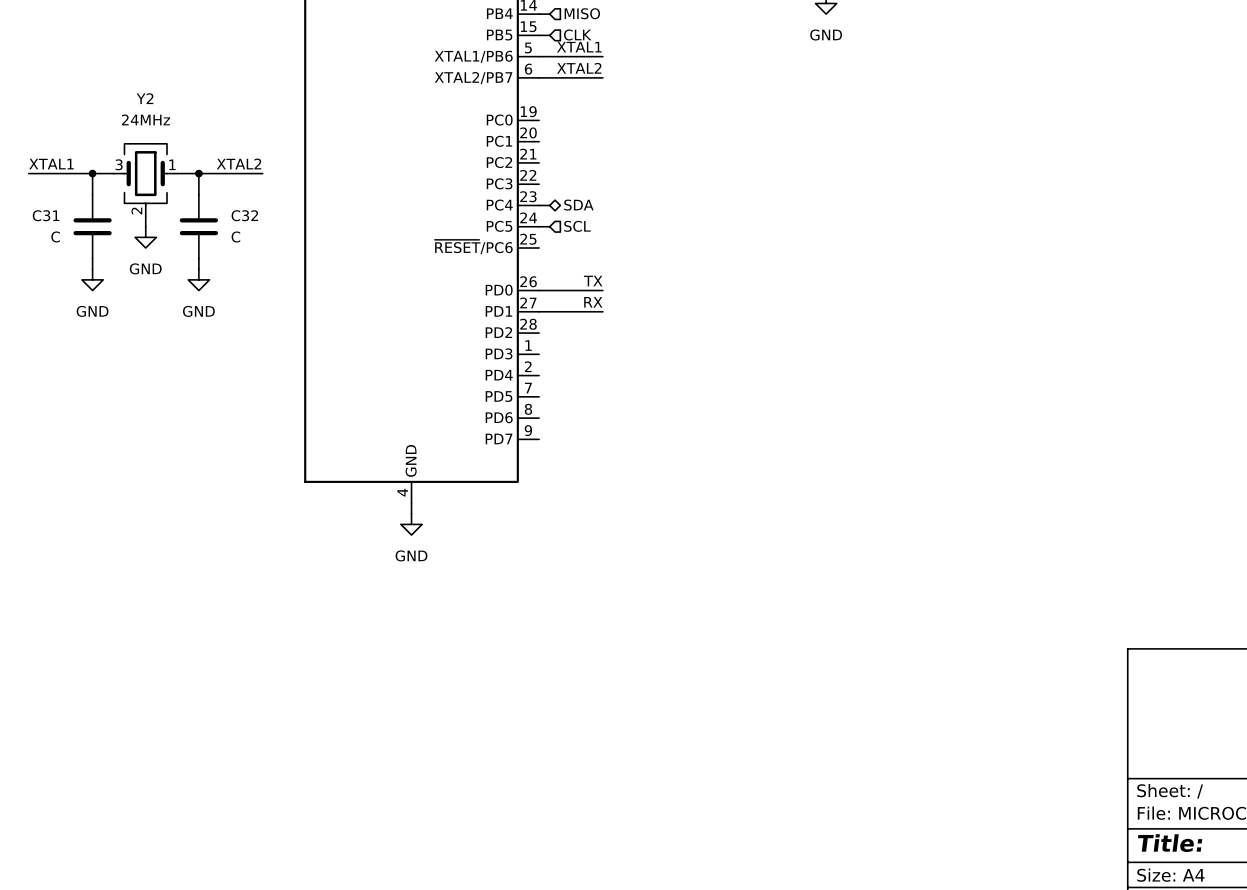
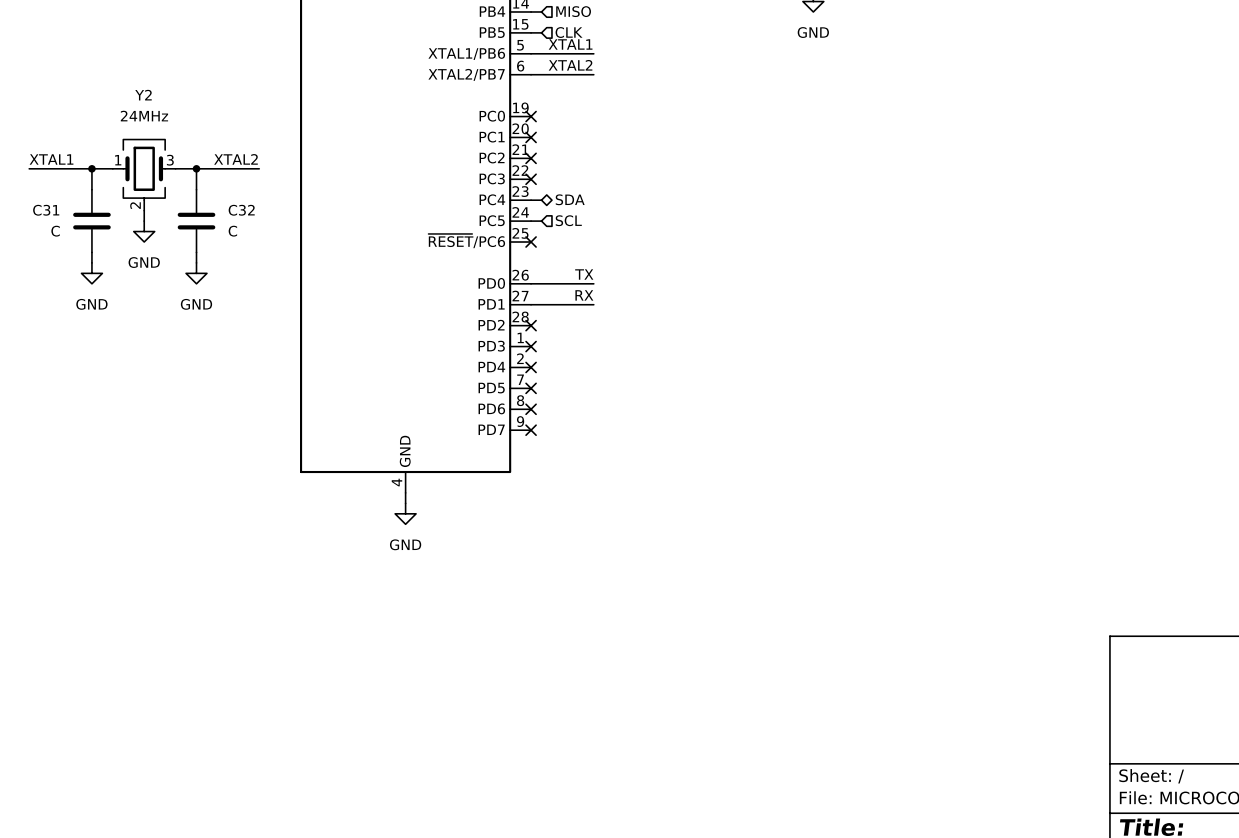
no-connect mark: none -> (531, 116)
no-connect mark: none -> (531, 137)
no-connect mark: none -> (531, 158)
Y2 flip: as is (145, 174) -> left-right (144, 169)
no-connect mark: none -> (531, 179)
no-connect mark: none -> (531, 242)
no-connect mark: none -> (531, 325)
no-connect mark: none -> (531, 346)
no-connect mark: none -> (531, 367)
no-connect mark: none -> (531, 388)
no-connect mark: none -> (531, 409)
no-connect mark: none -> (531, 430)

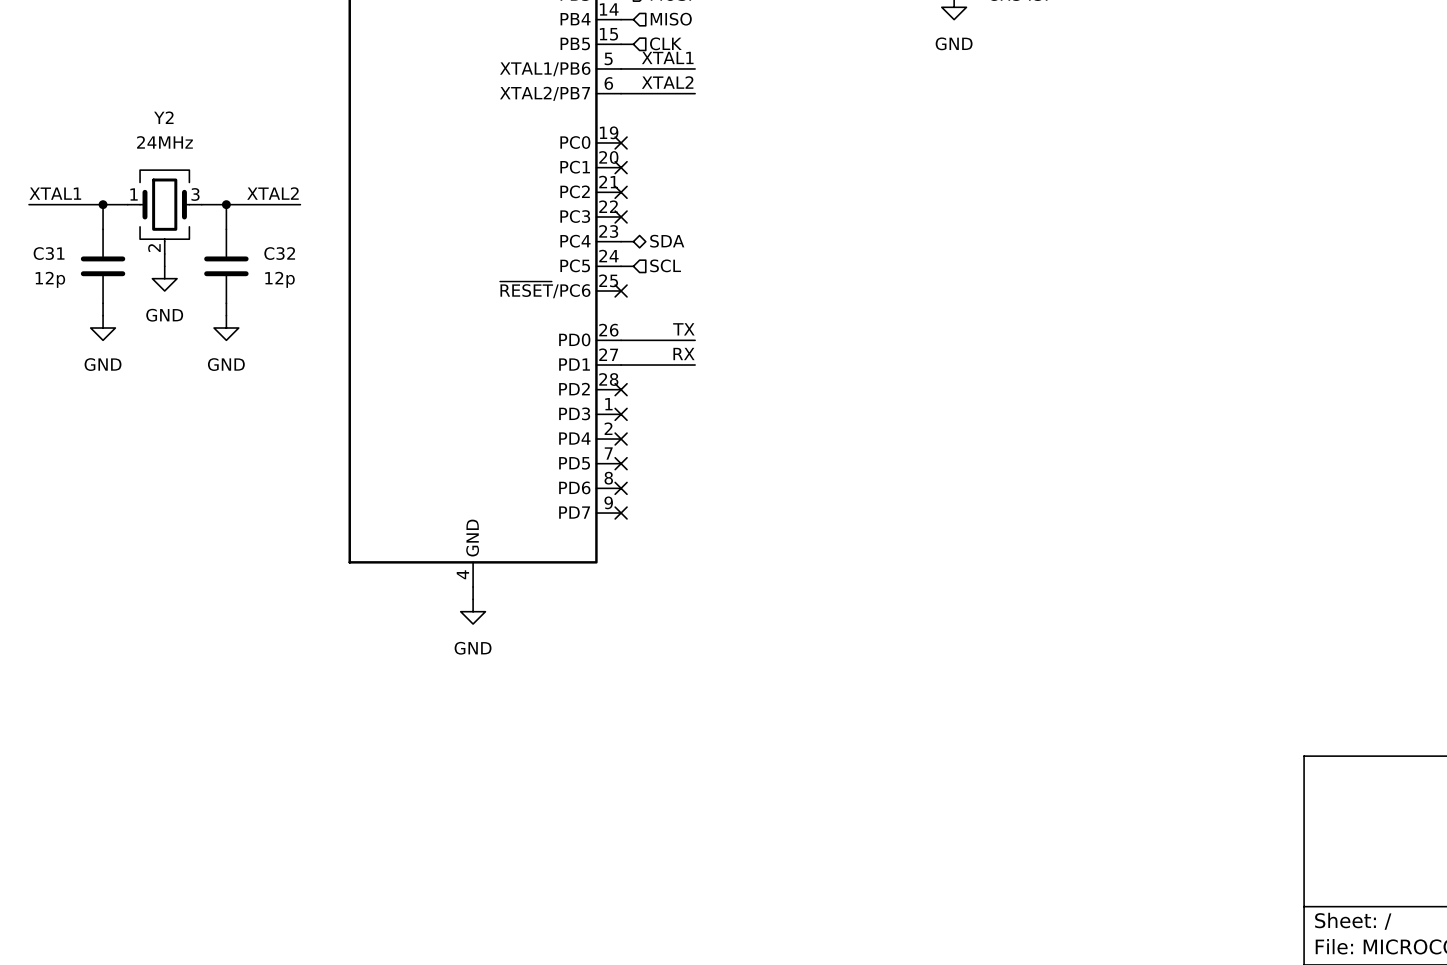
C31 value: C (55, 231) -> 12p (50, 279)
C32 value: C (232, 231) -> 12p (279, 279)

